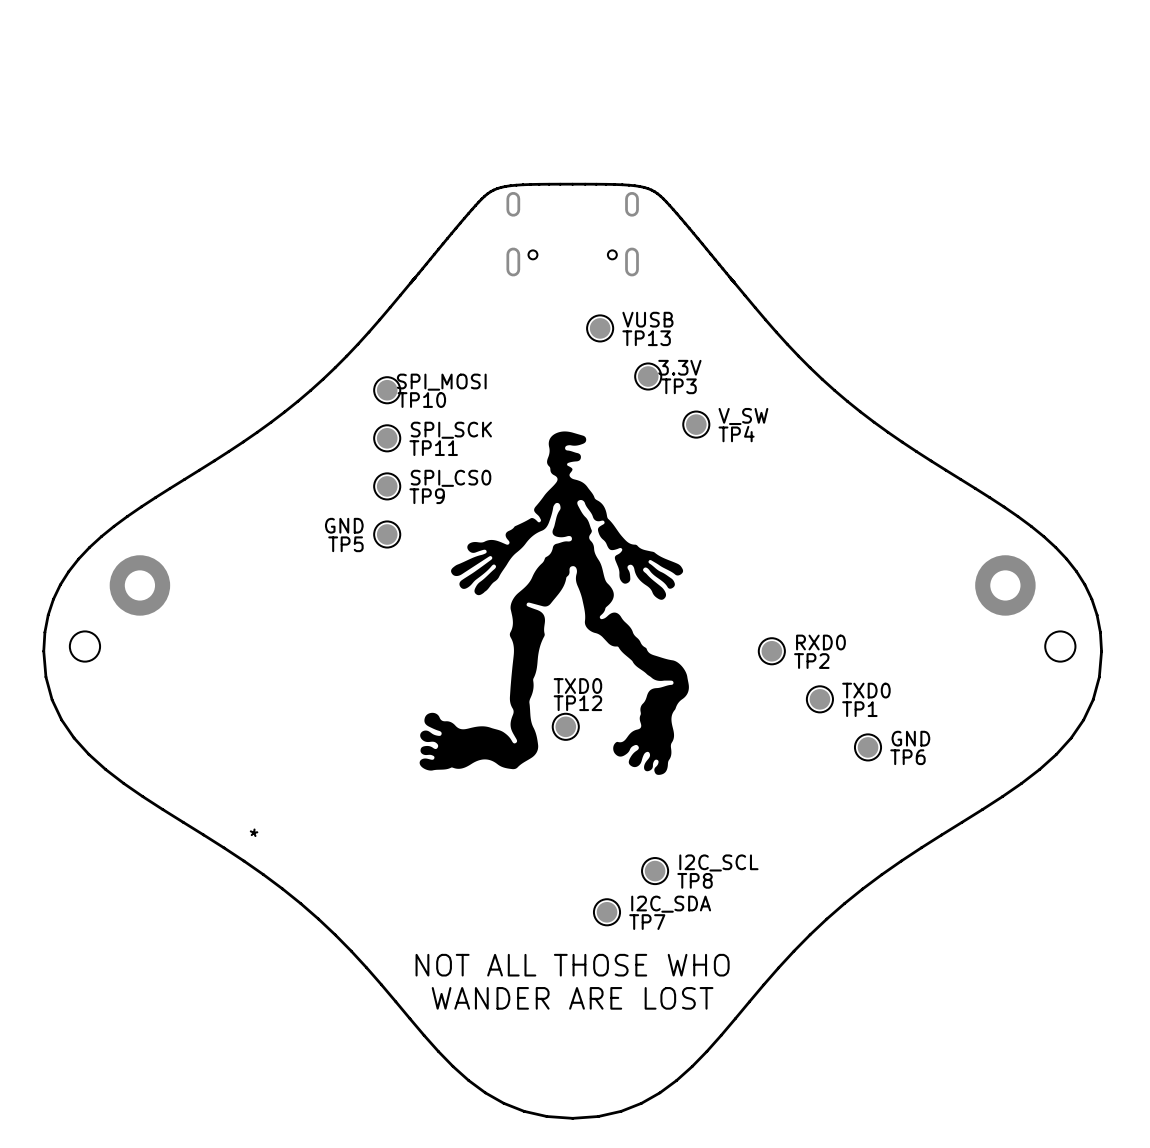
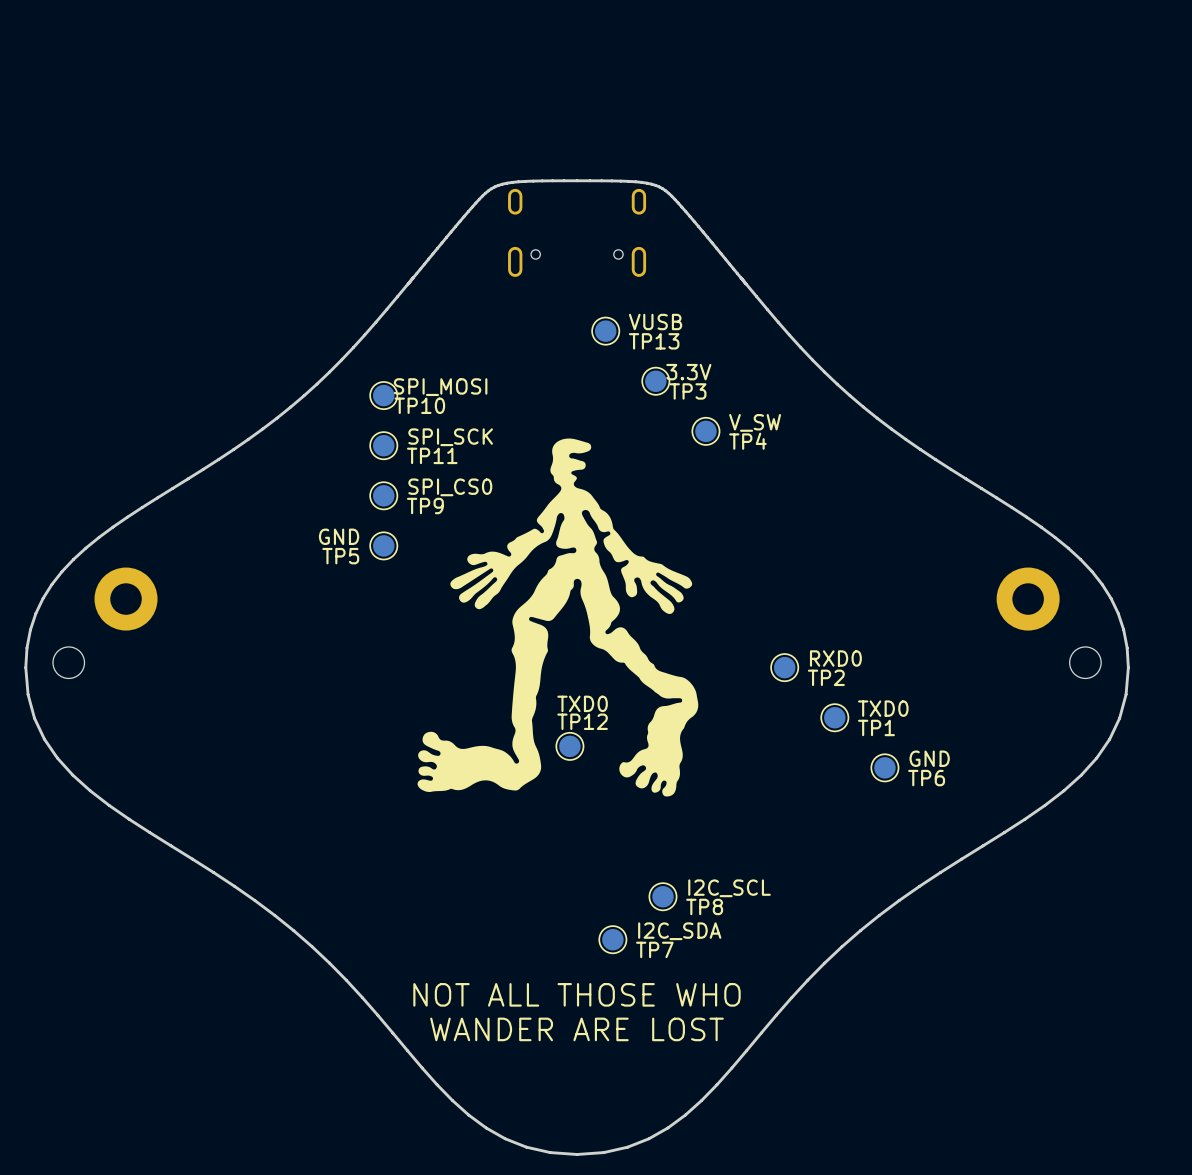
part: (254, 832) -> none

